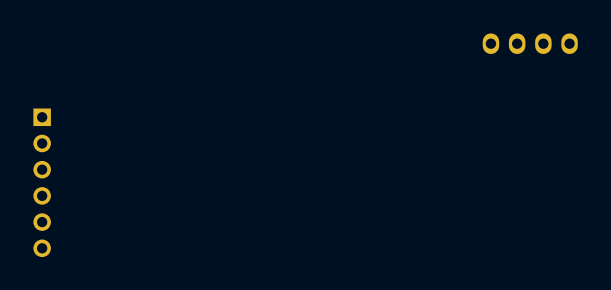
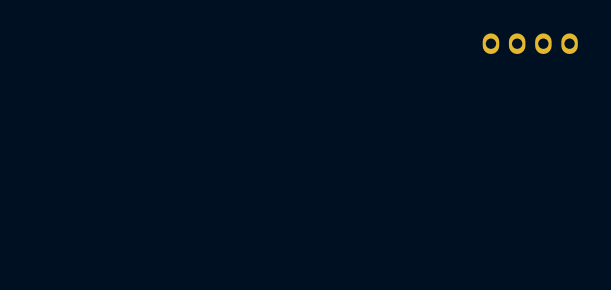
part: (42, 182) -> none

